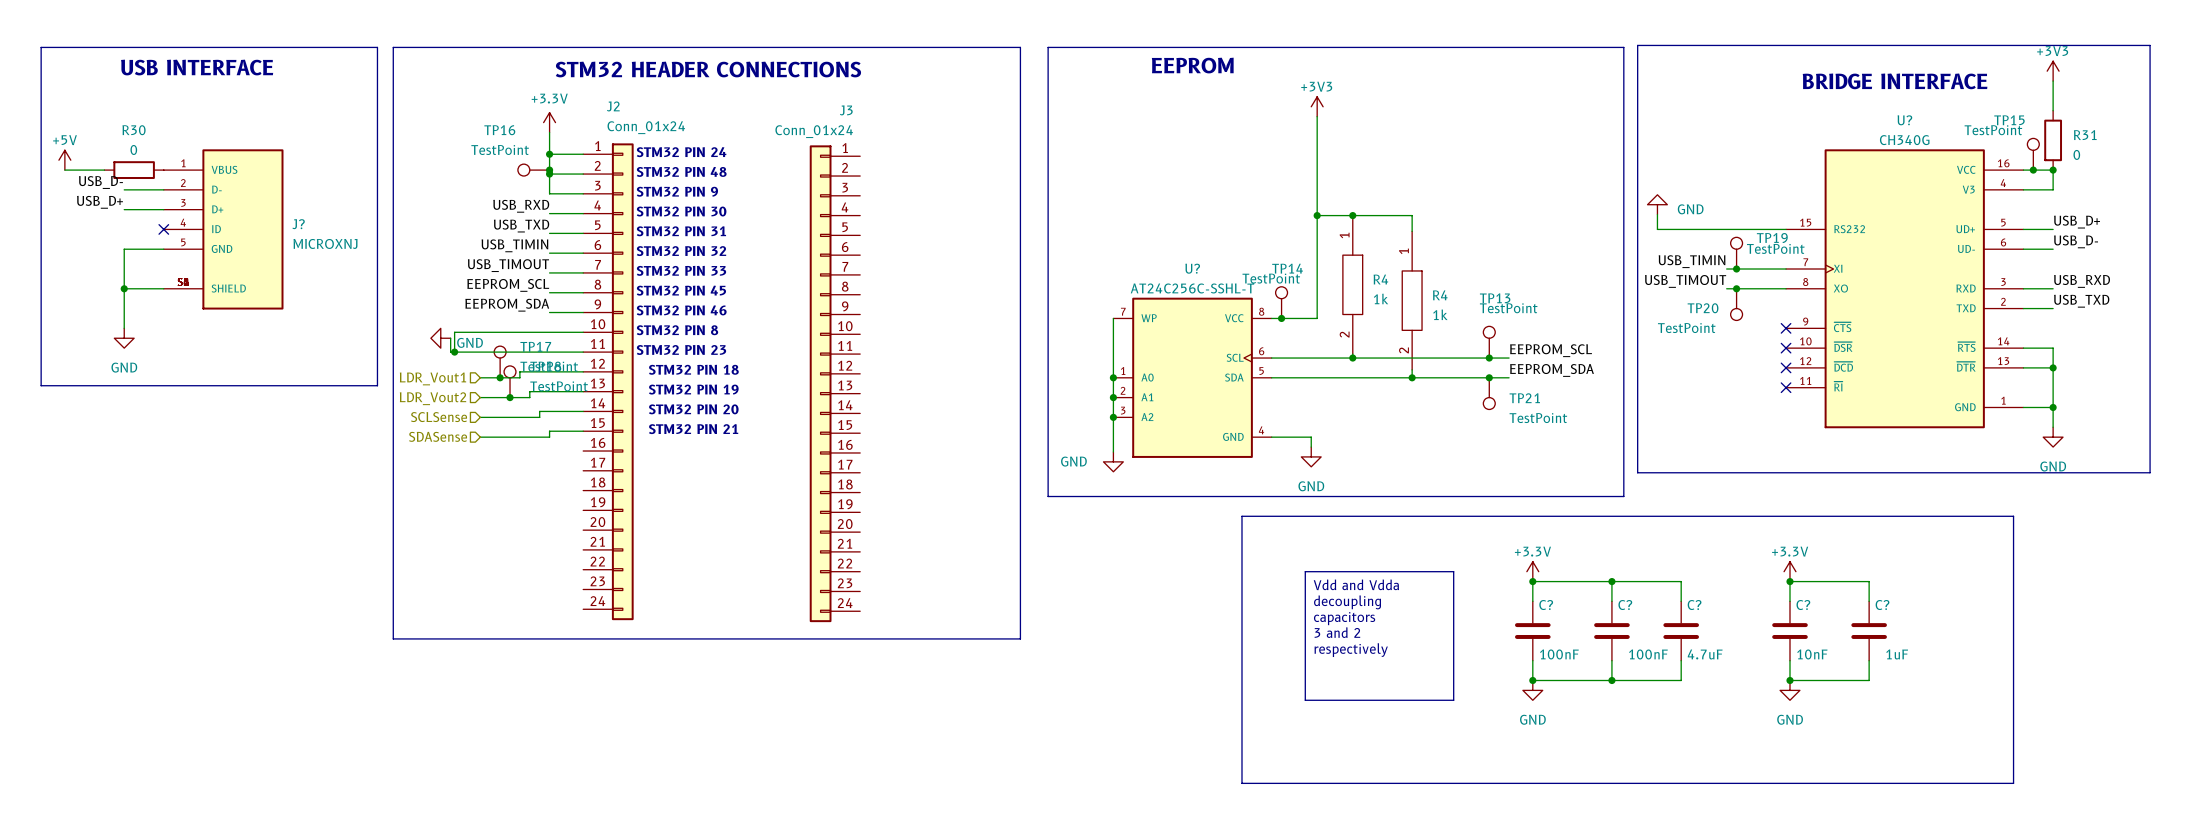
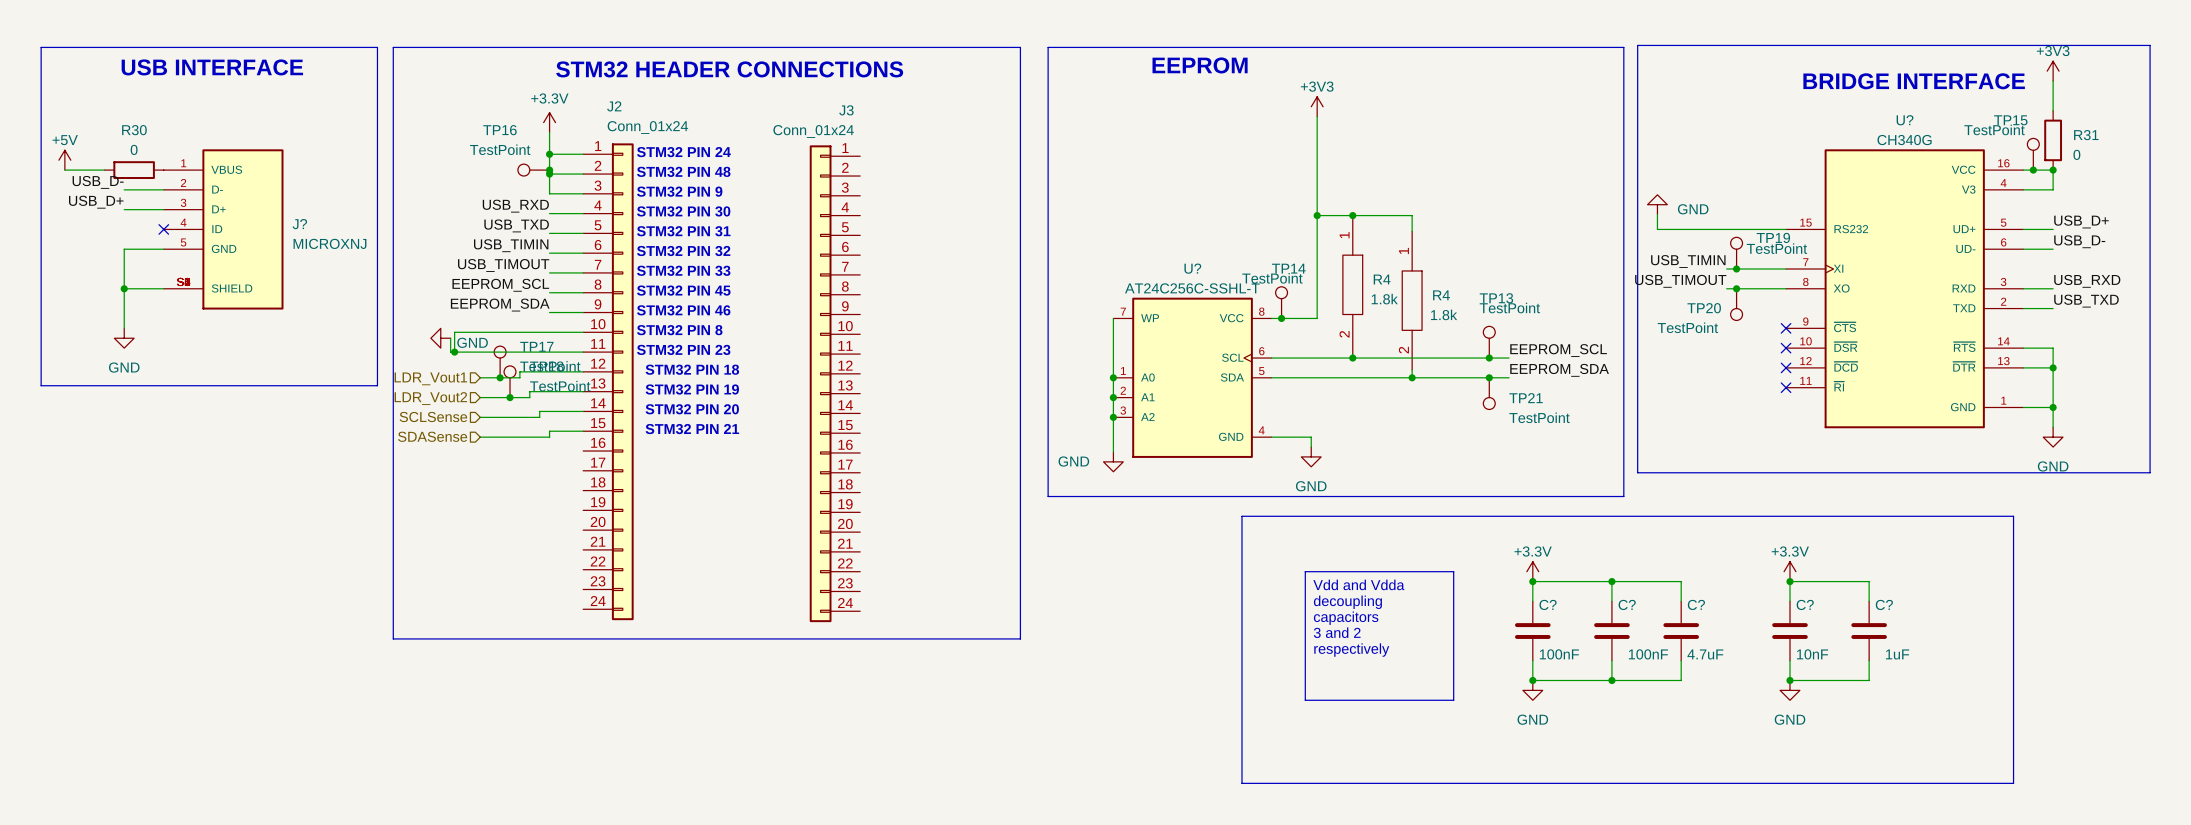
R4 value: 1k (1381, 298) -> 1.8k (1384, 299)
R4 value: 1k (1440, 314) -> 1.8k (1444, 314)

